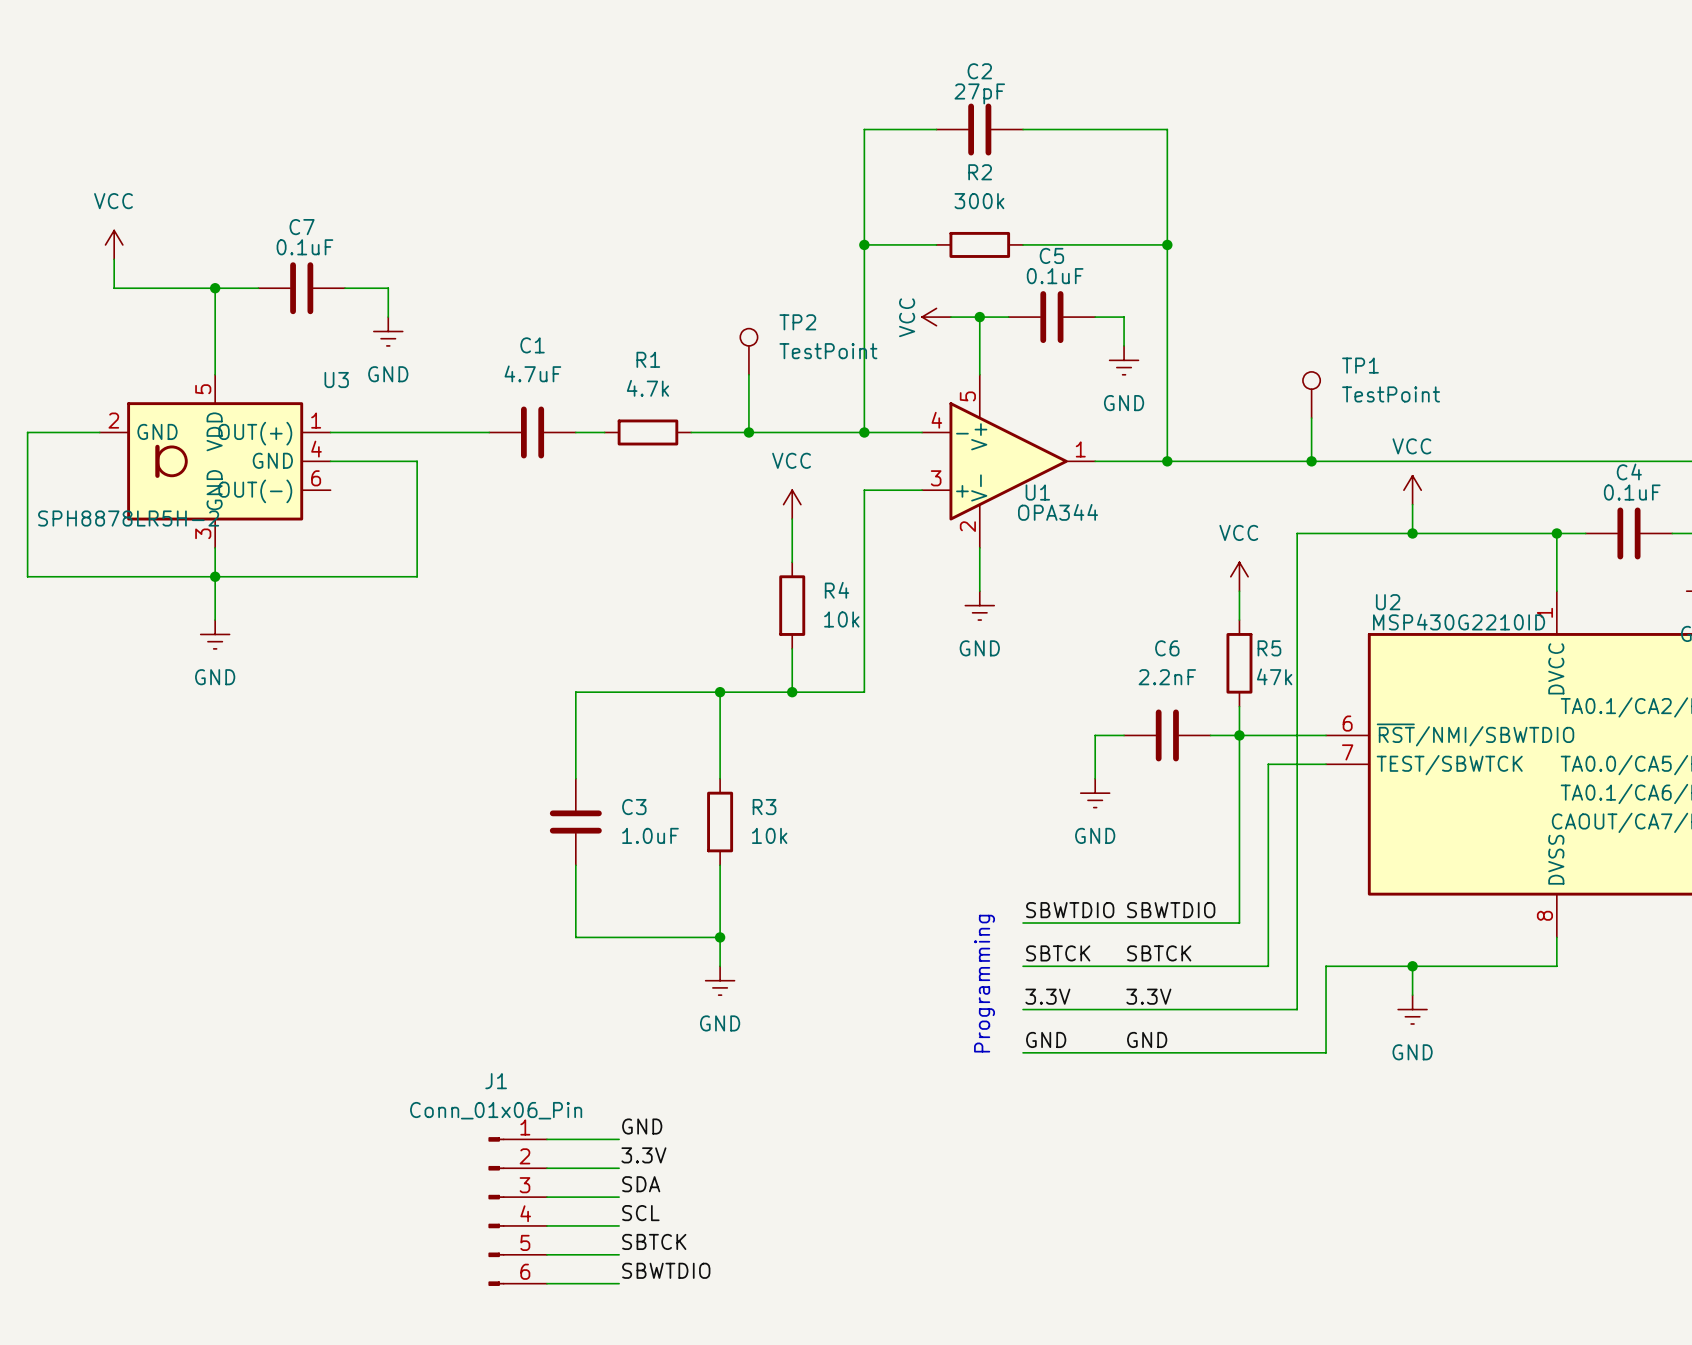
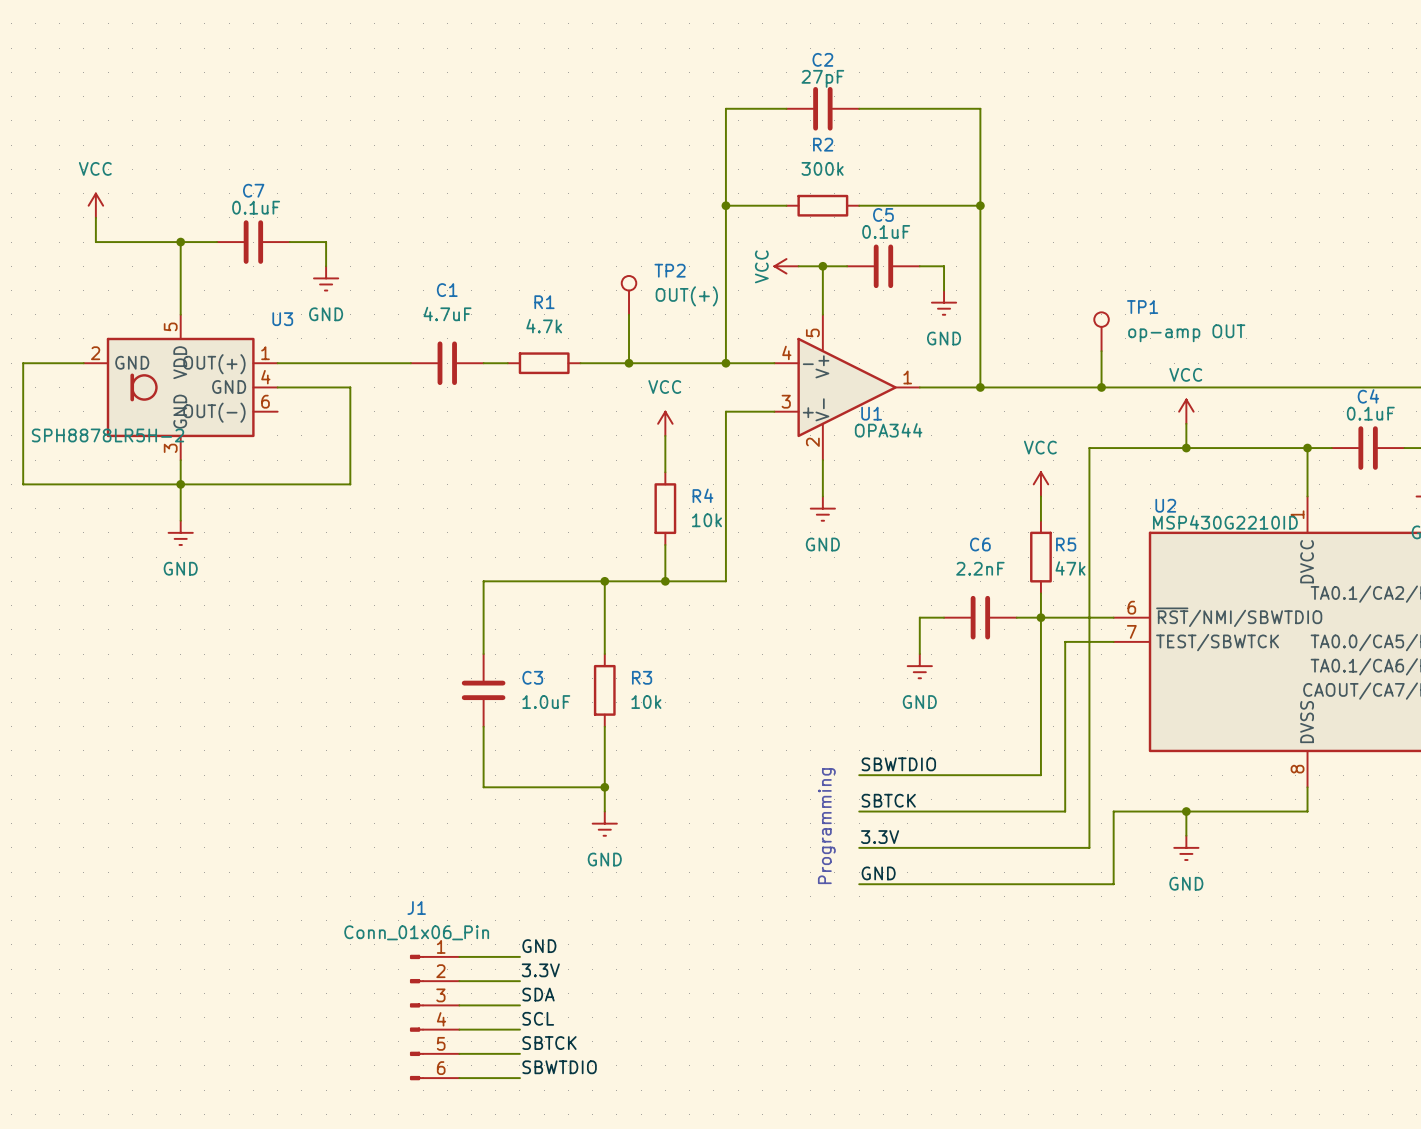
TP2 value: TestPoint (828, 351) -> OUT(+) (686, 296)
TP1 value: TestPoint (1391, 394) -> op-amp OUT (1186, 333)
label: SBWTDIO (1171, 910) -> none
label: SBTCK (1159, 953) -> none
label: 3.3V (1148, 996) -> none
label: GND (1147, 1039) -> none

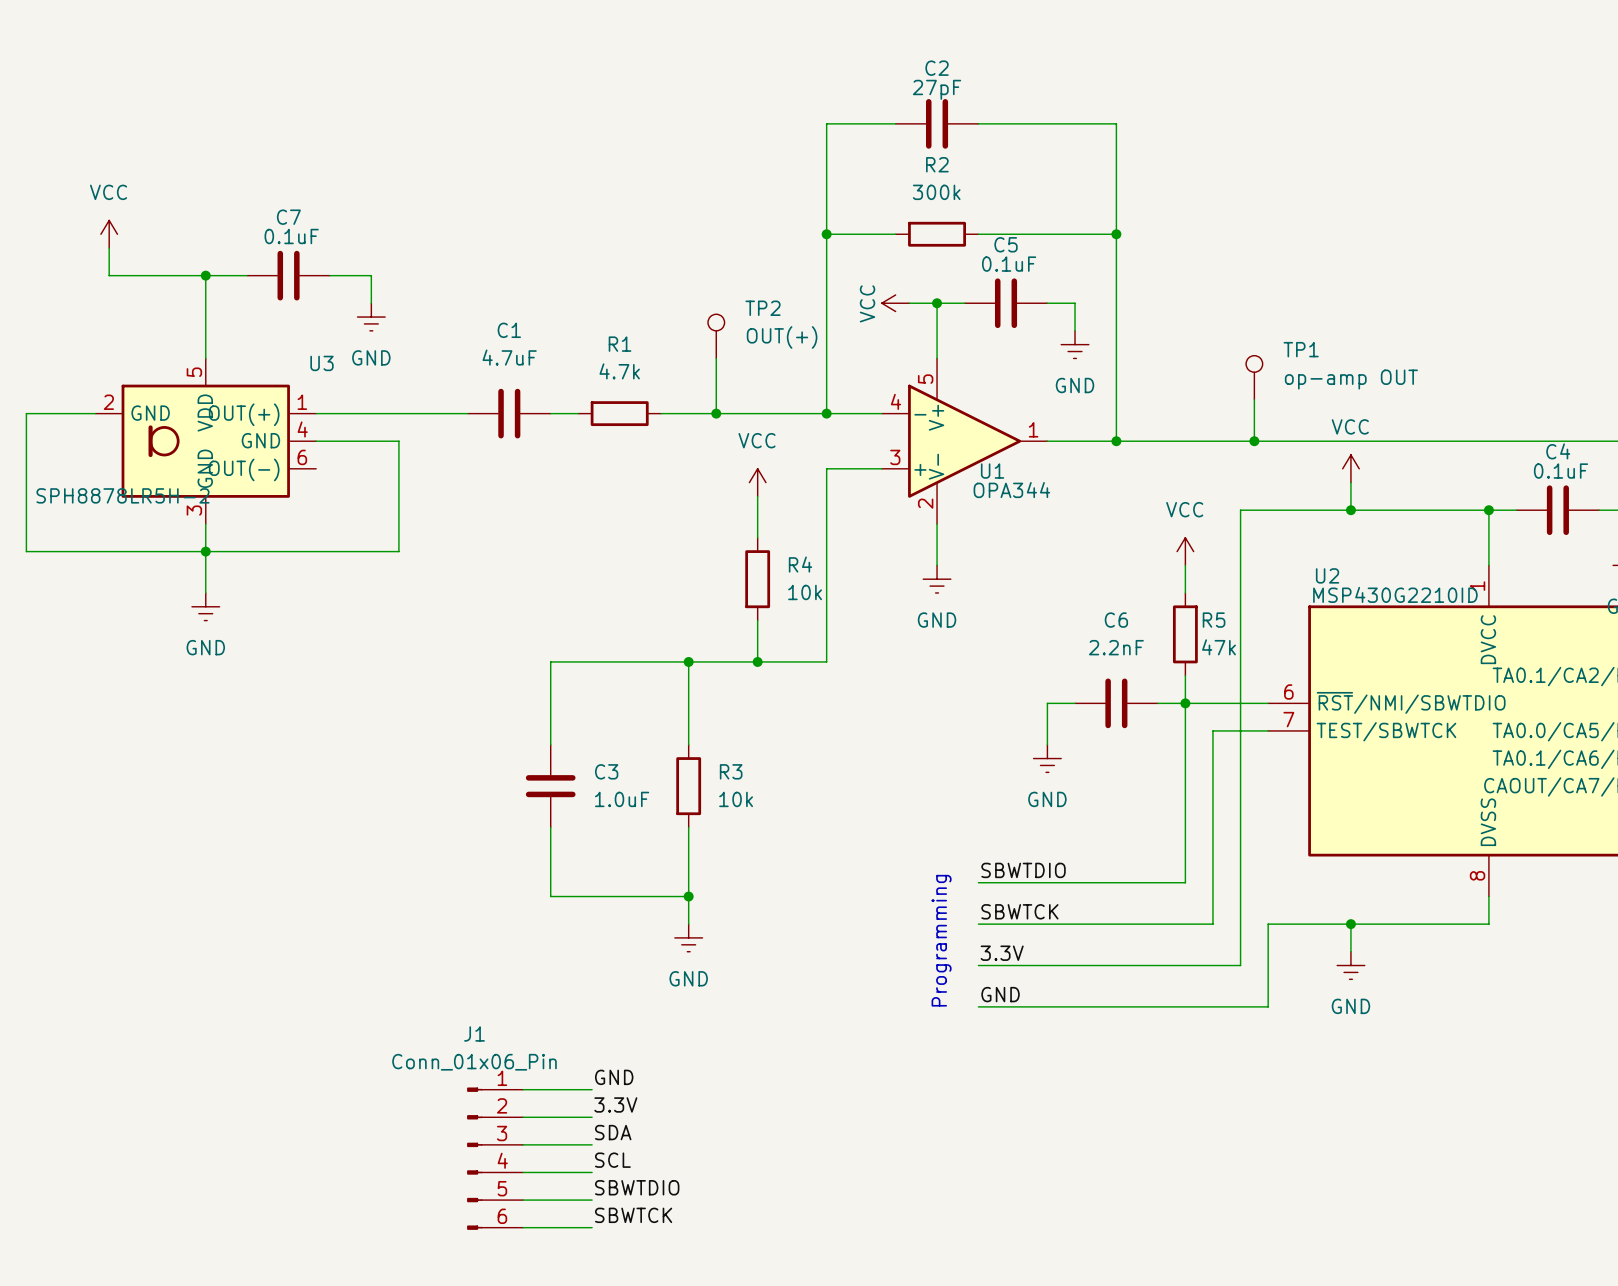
label: SBTCK (888, 800) -> SBWTCK (1019, 911)
label: SBTCK (549, 1043) -> SBWTDIO (637, 1187)
label: SBWTDIO (559, 1067) -> SBWTCK (633, 1215)

